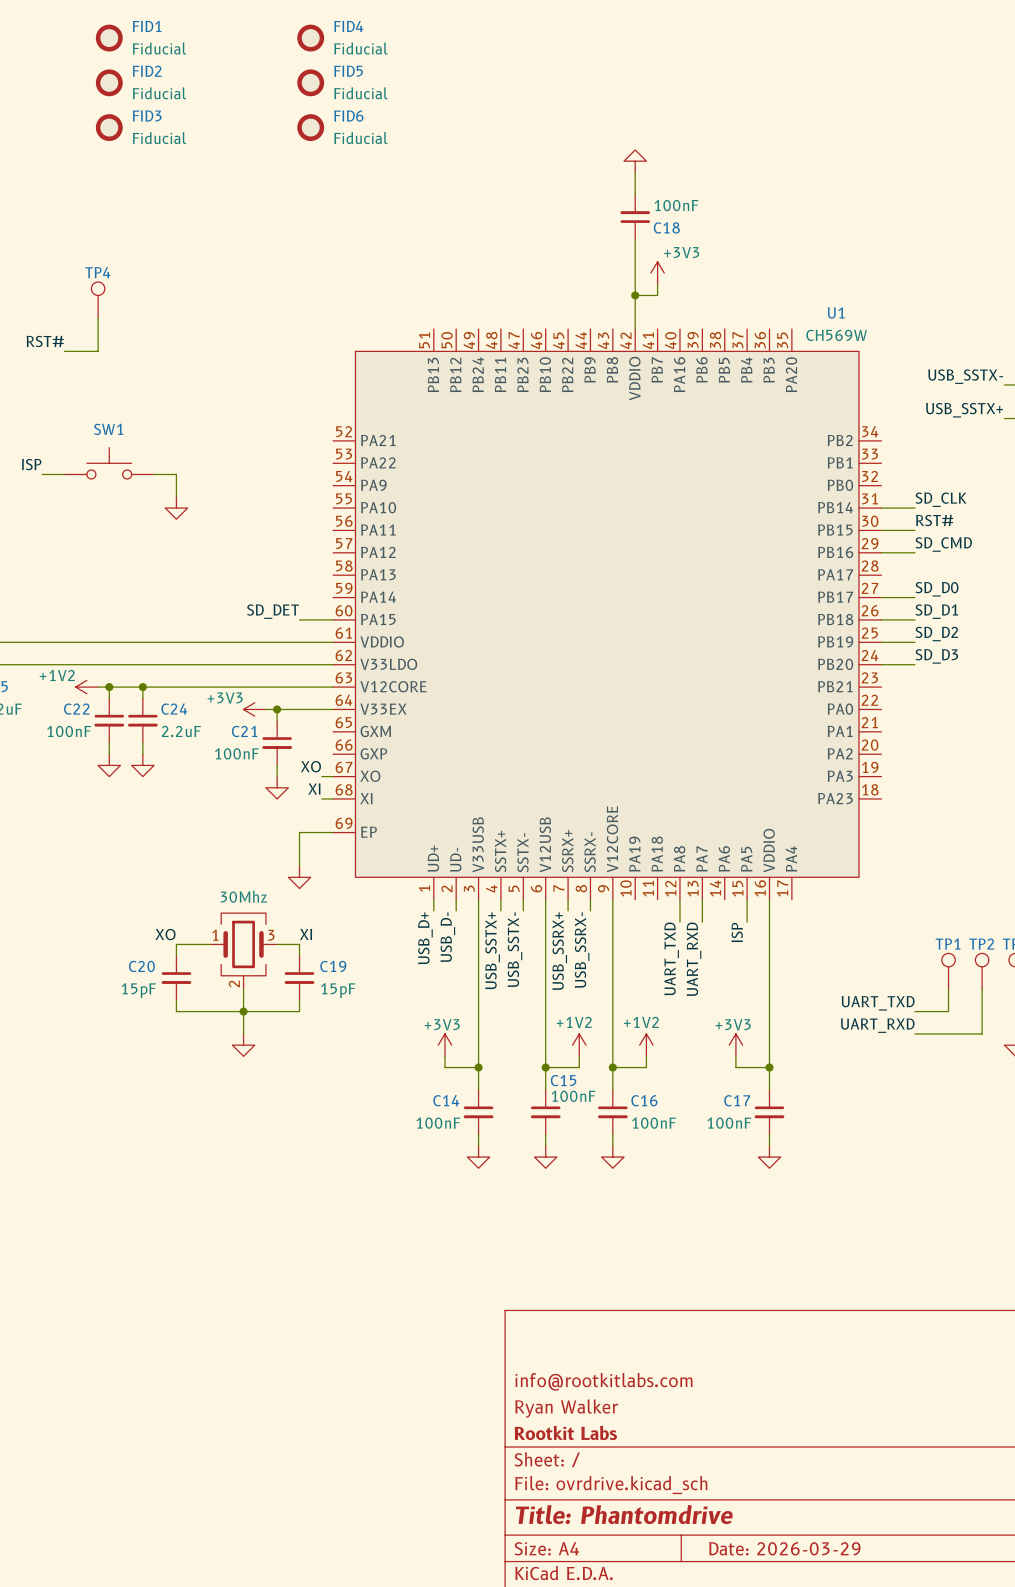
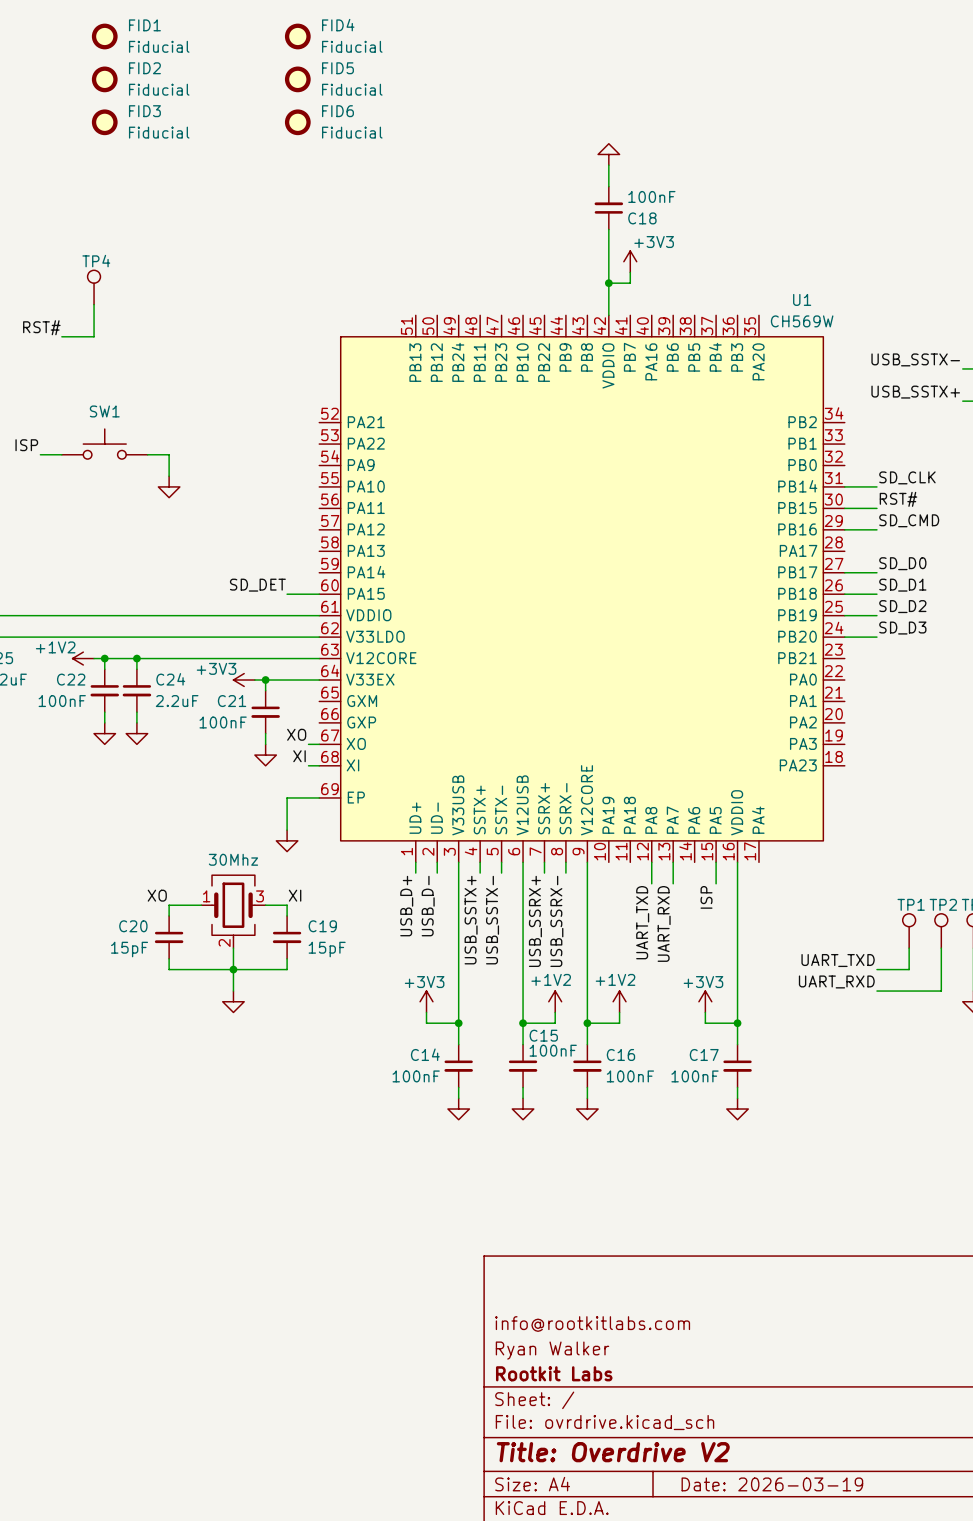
title block: Title: Phantomdrive (624, 1514) -> Title: Overdrive V2 (613, 1452)
title block: Date: 2026-03-29 (784, 1548) -> Date: 2026-03-19 (772, 1484)

